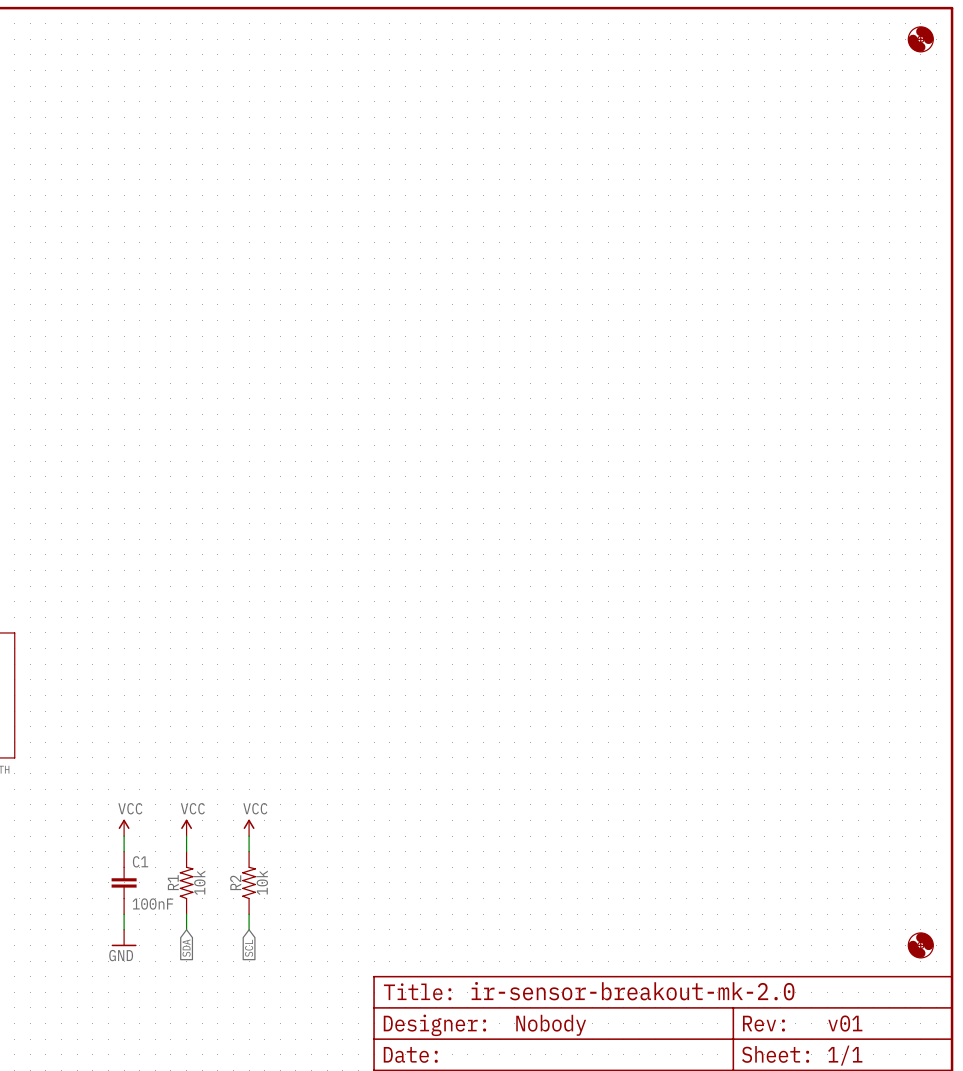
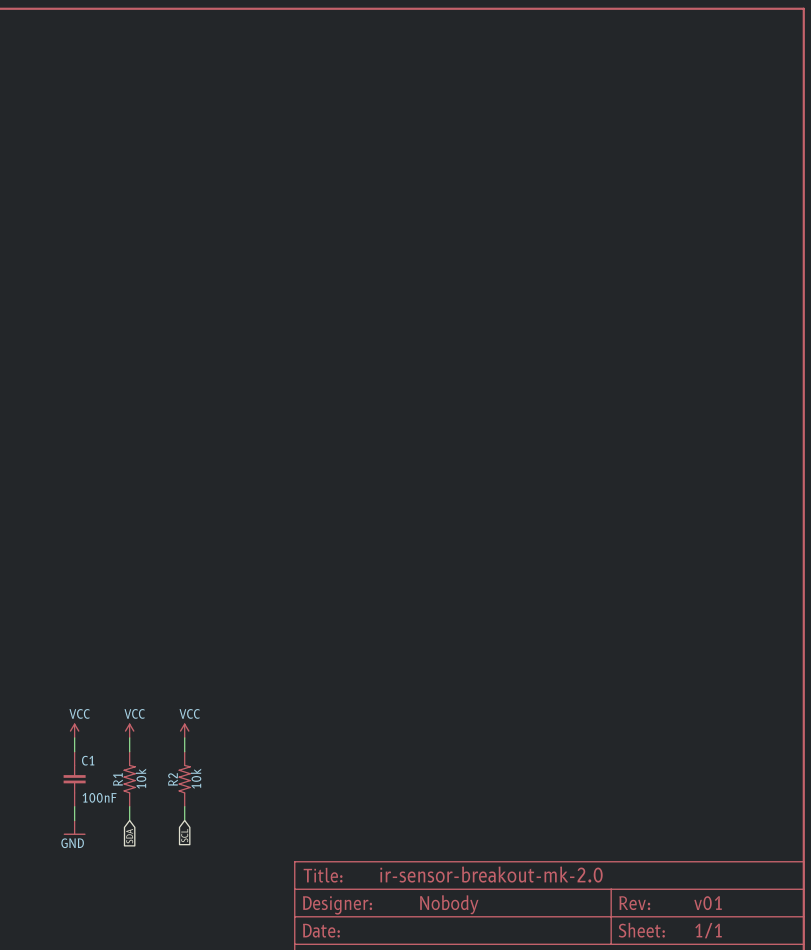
part: (920, 39) -> none
part: (920, 945) -> none

